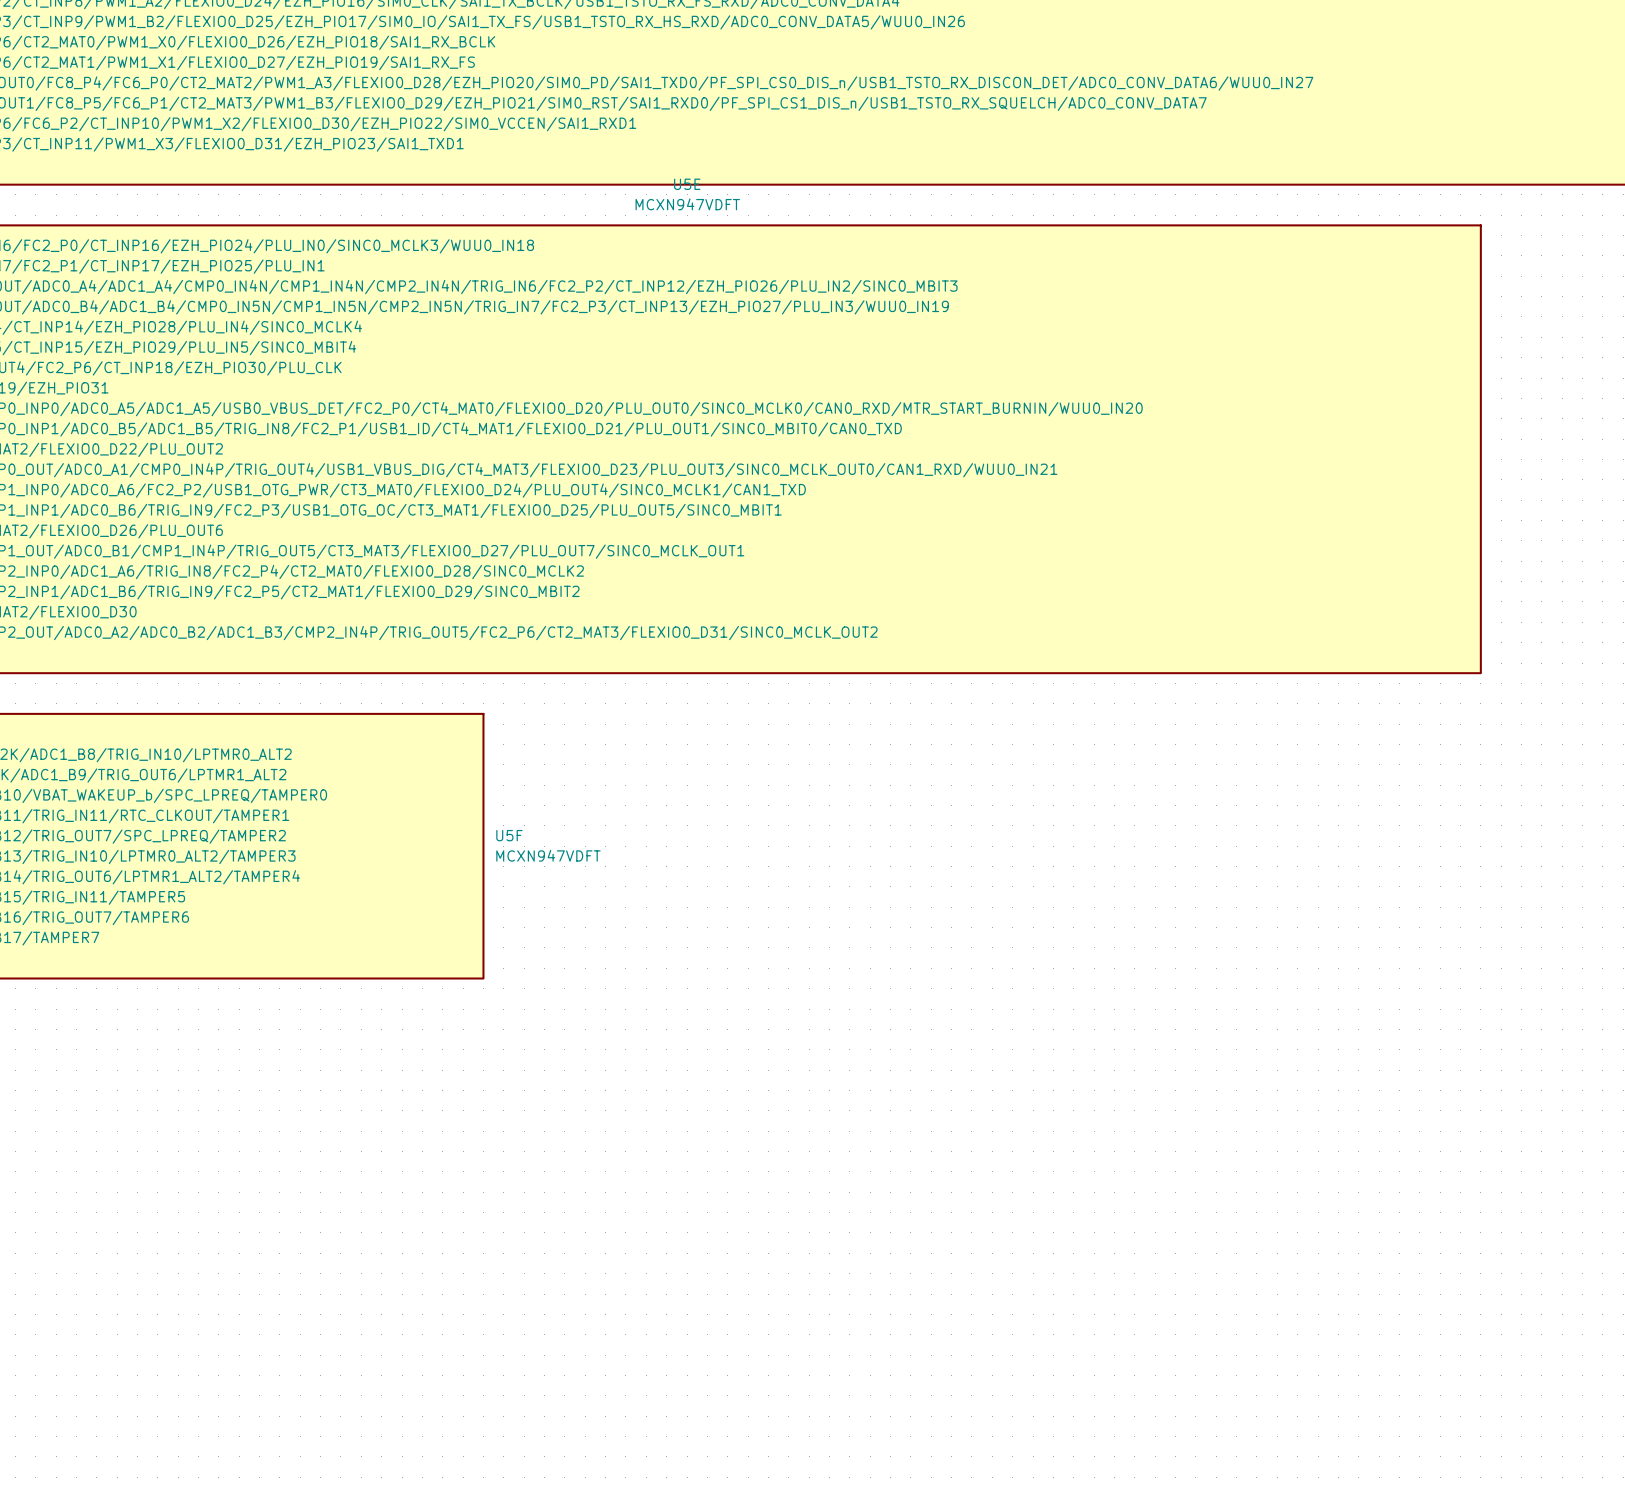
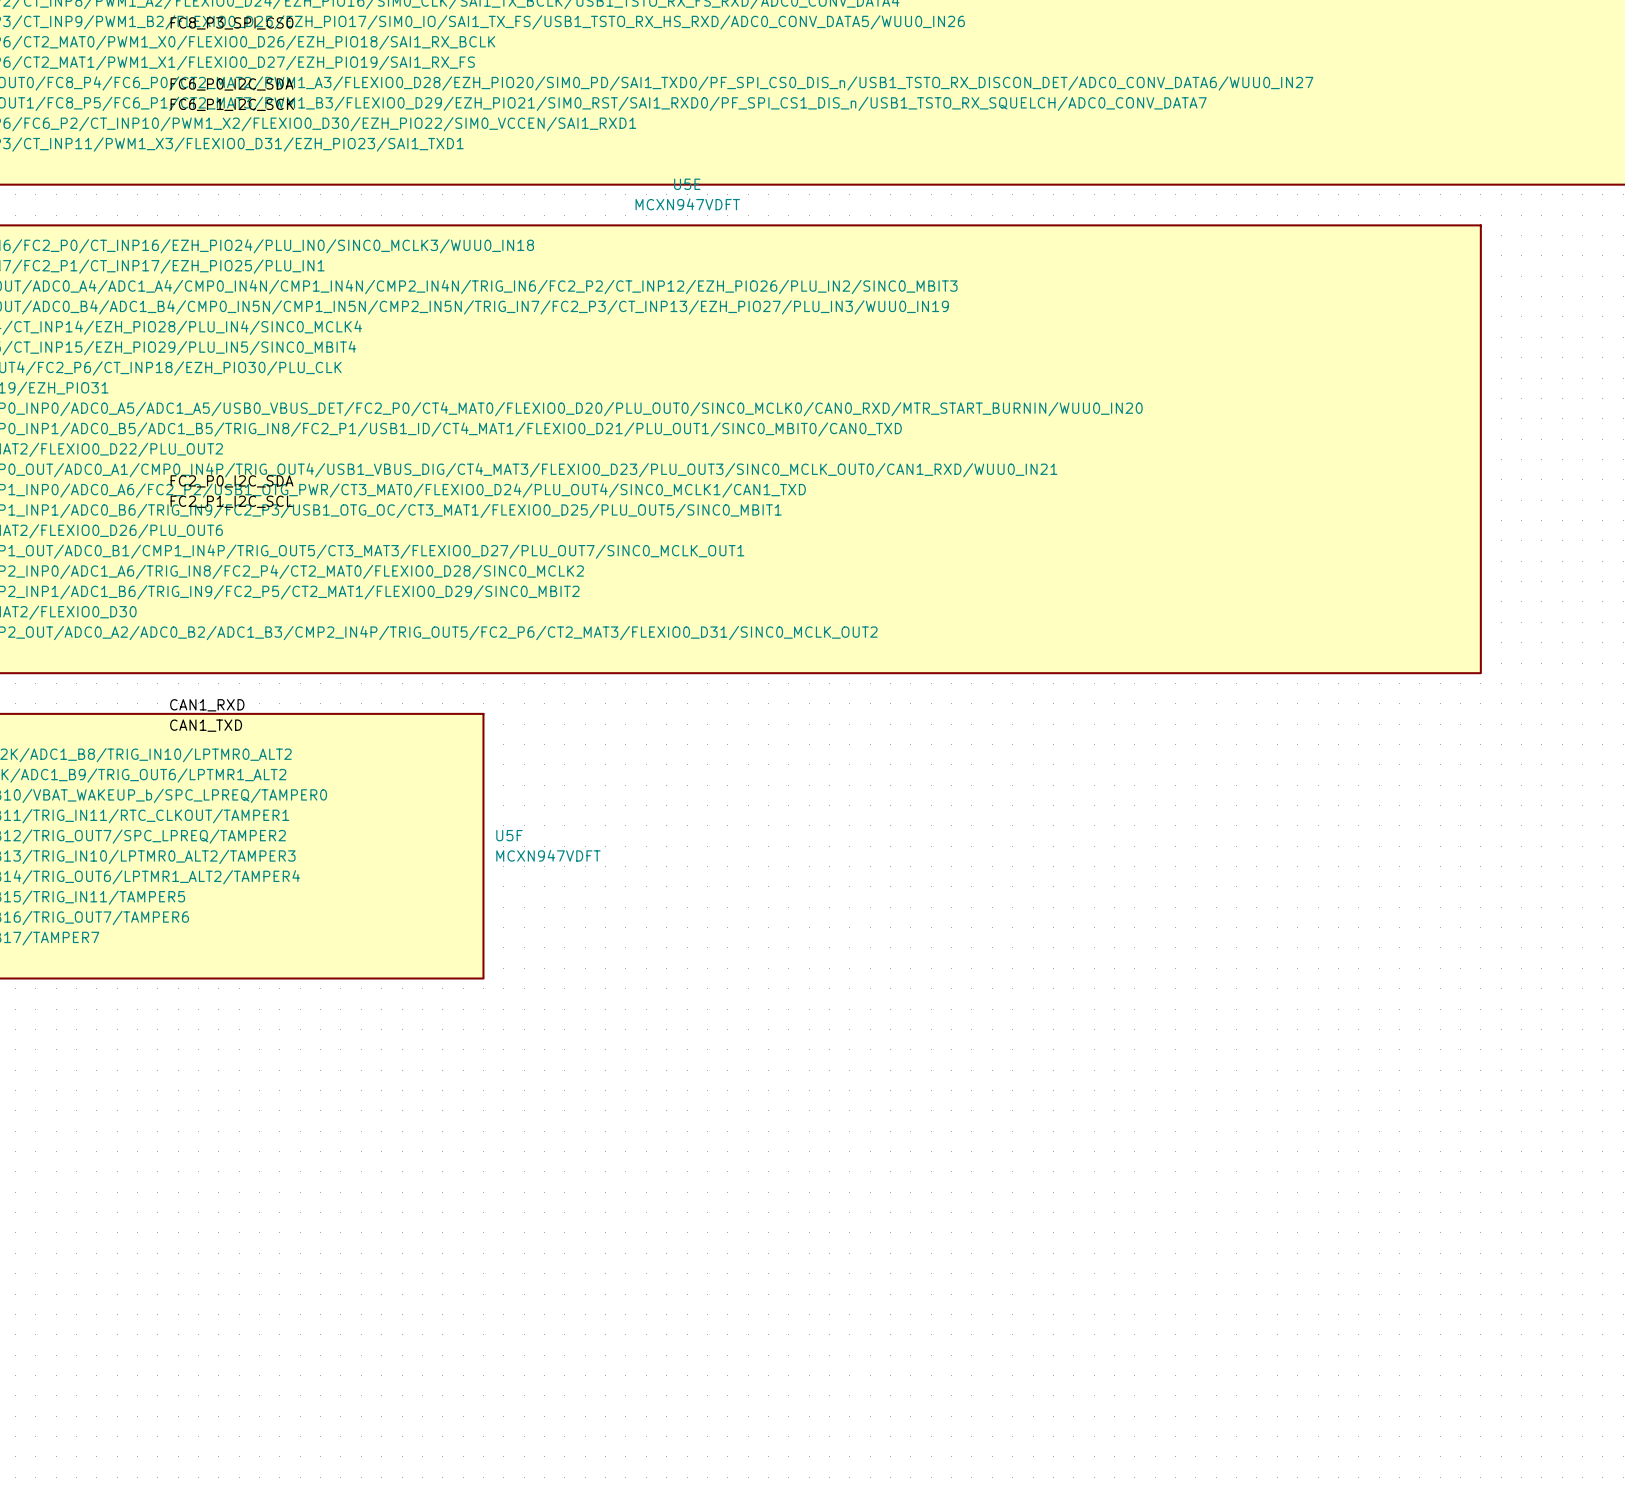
label: none -> FC8_P3_SPI_CS0 (232, 23)
label: none -> FC6_P0_I2C_SDA (232, 84)
label: none -> FC6_P1_I2C_SCK (232, 104)
label: none -> FC2_P0_I2C_SDA (232, 481)
label: none -> FC2_P1_I2C_SCL (231, 501)
label: none -> CAN1_RXD (207, 705)
label: none -> CAN1_TXD (206, 725)

